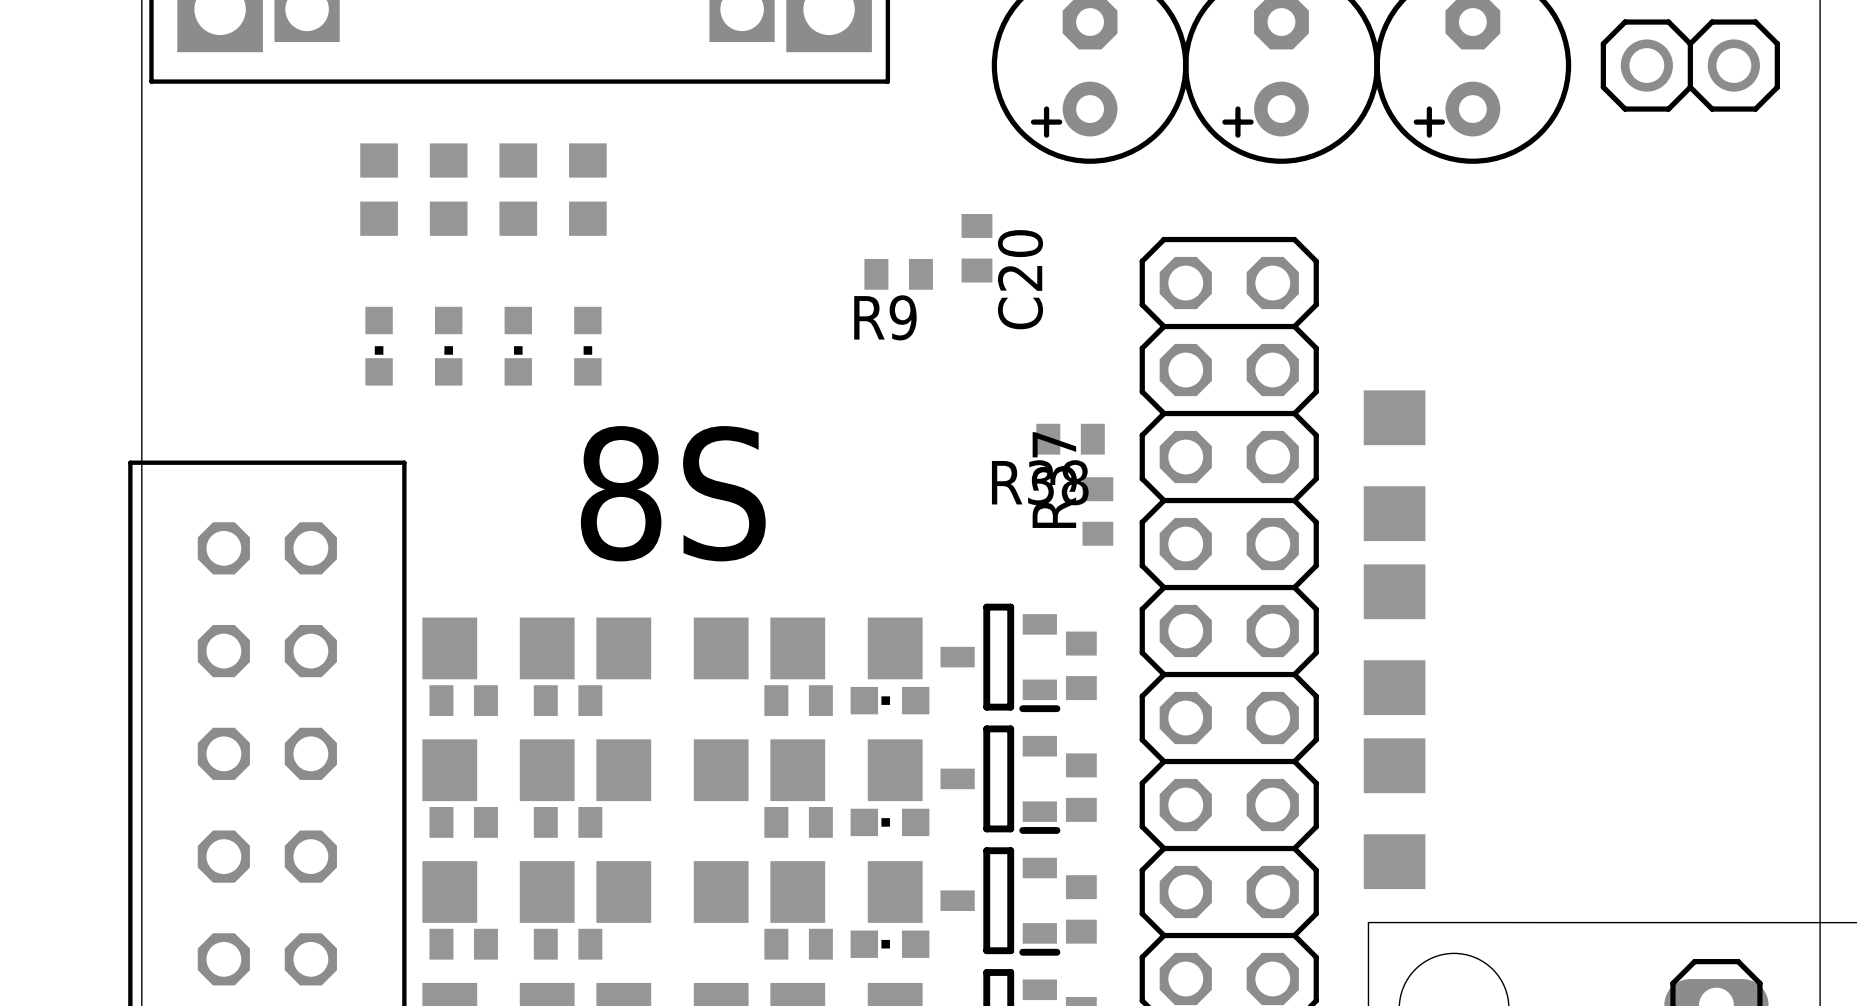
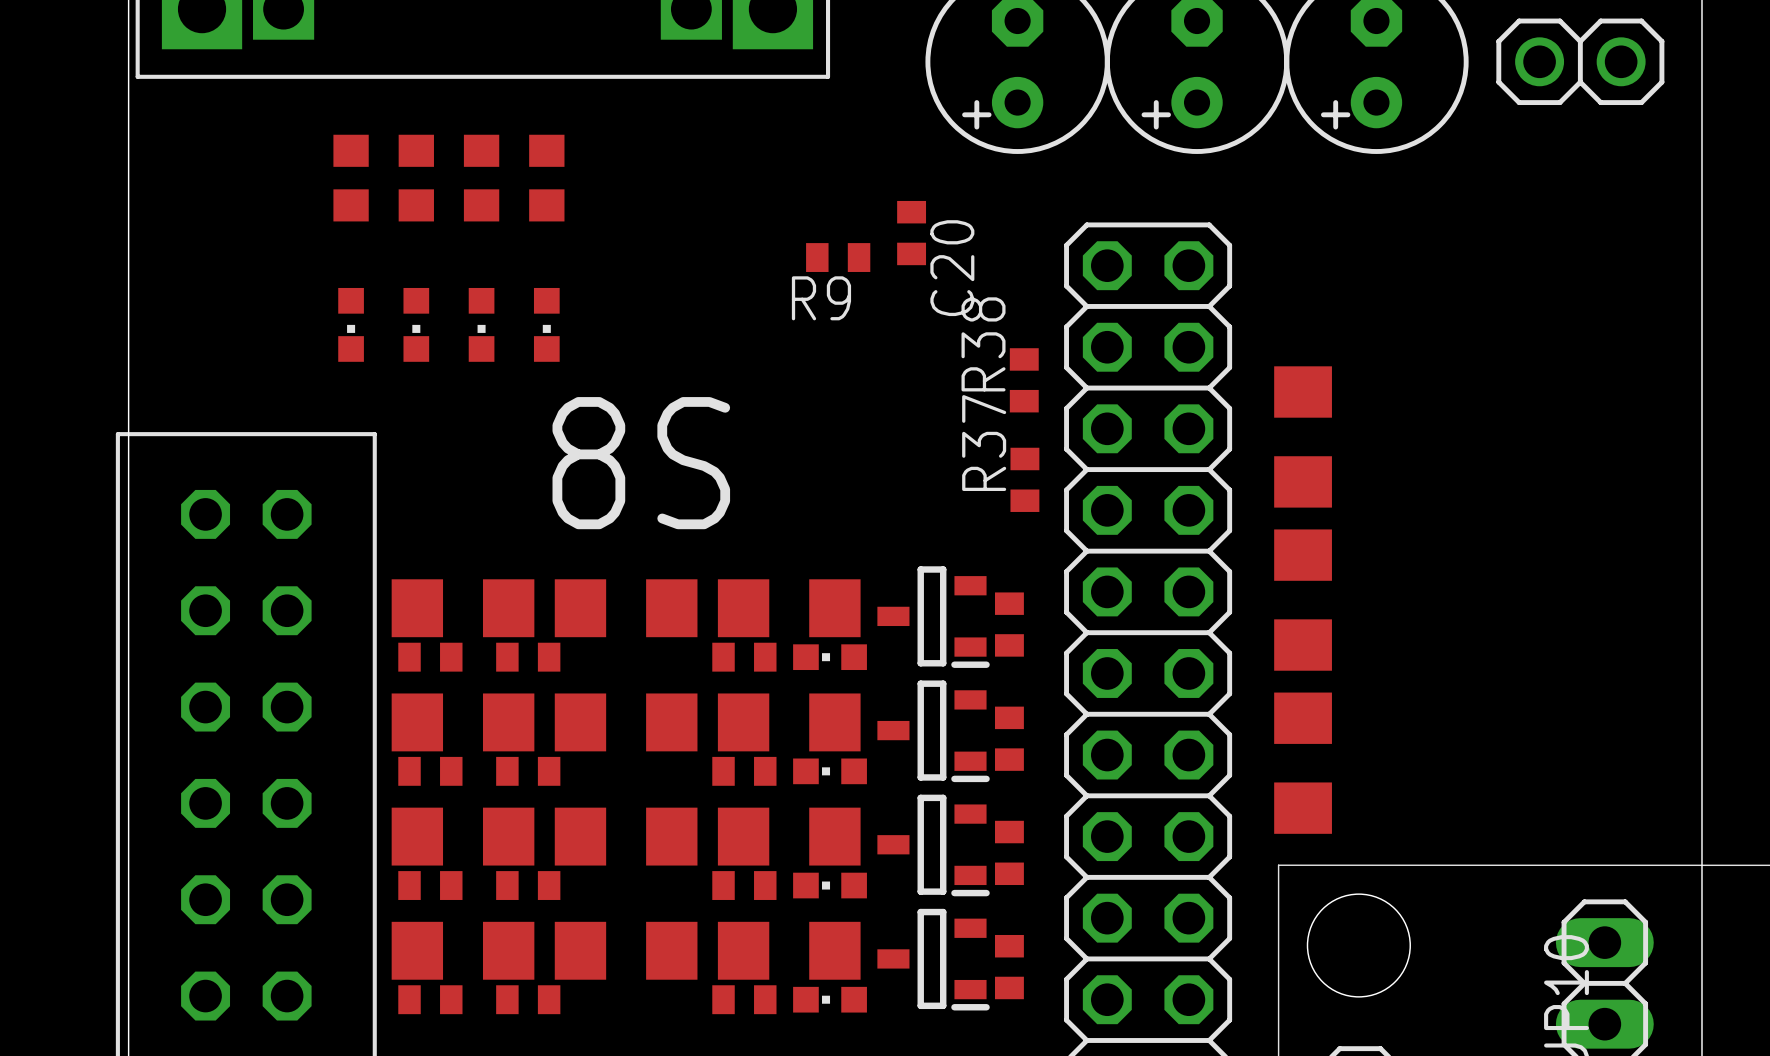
R38 rotation: 0° (1070, 439) -> 90° clockwise (1024, 380)
R38 position: (1070, 439) -> (1024, 380)

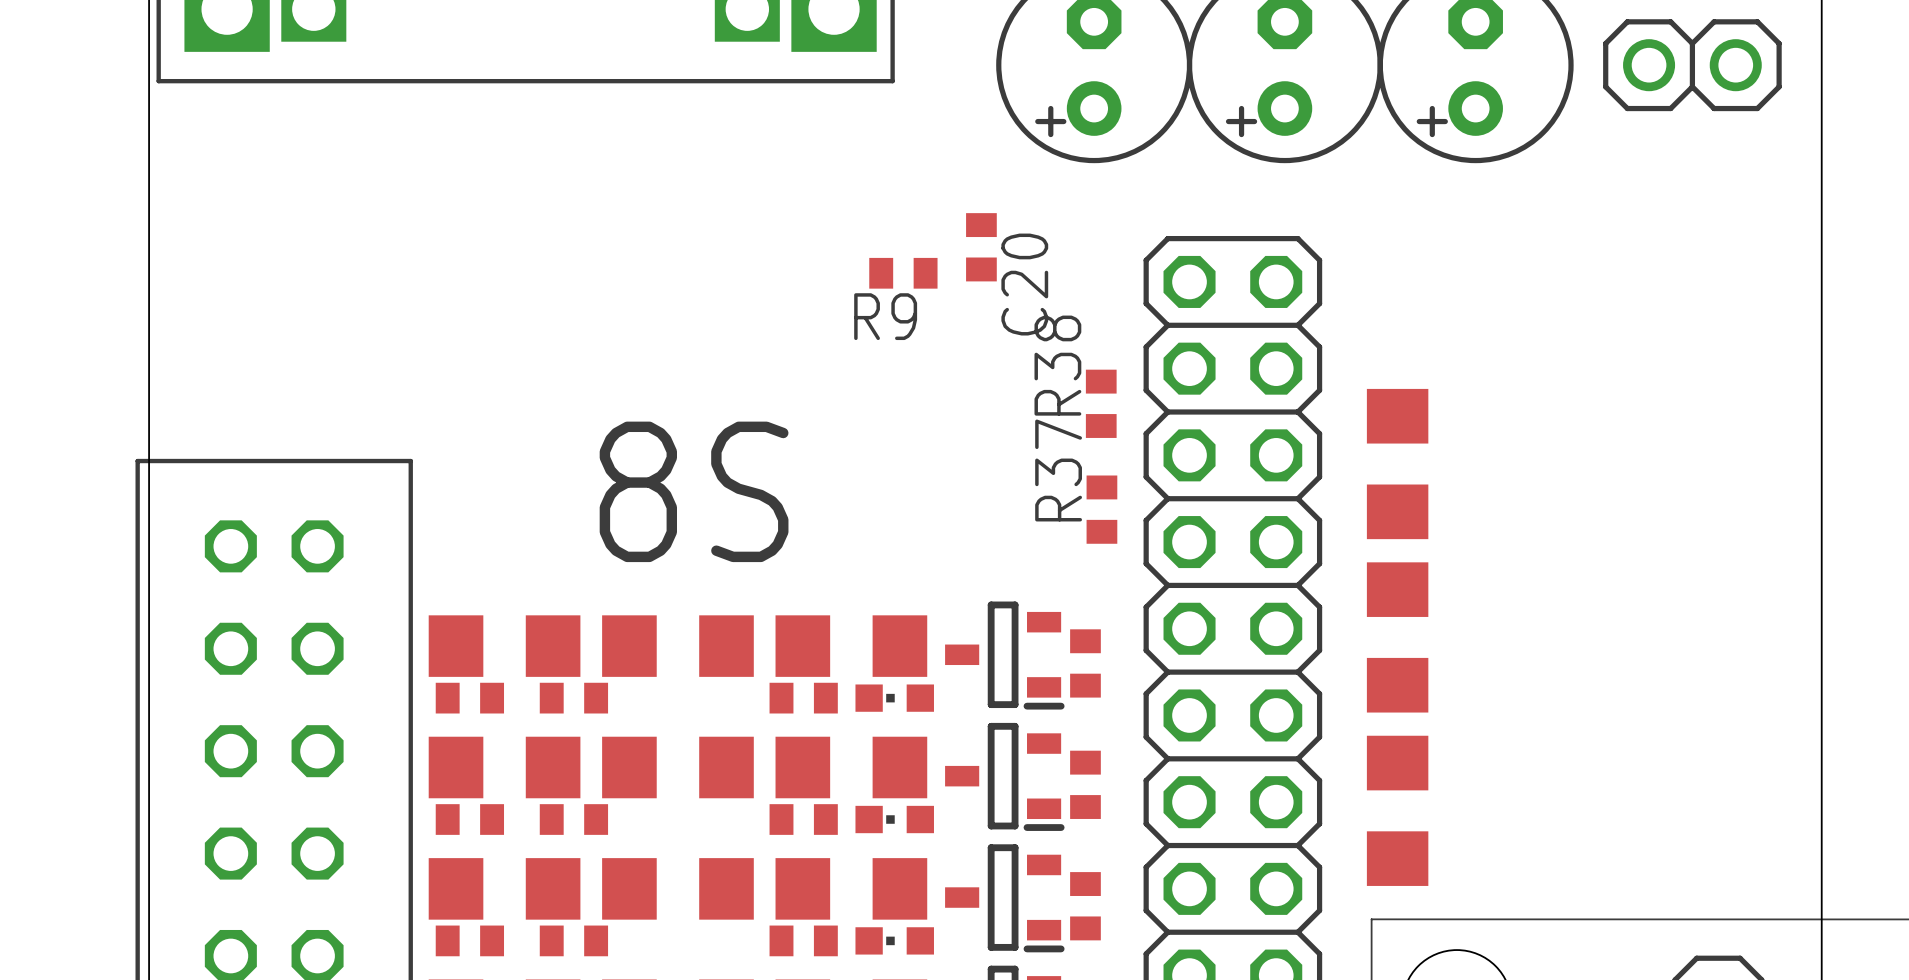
part: (351, 178) -> none
part: (416, 178) -> none
part: (481, 178) -> none
part: (546, 178) -> none
part: (351, 324) -> none
part: (416, 324) -> none
part: (481, 324) -> none
part: (546, 324) -> none

